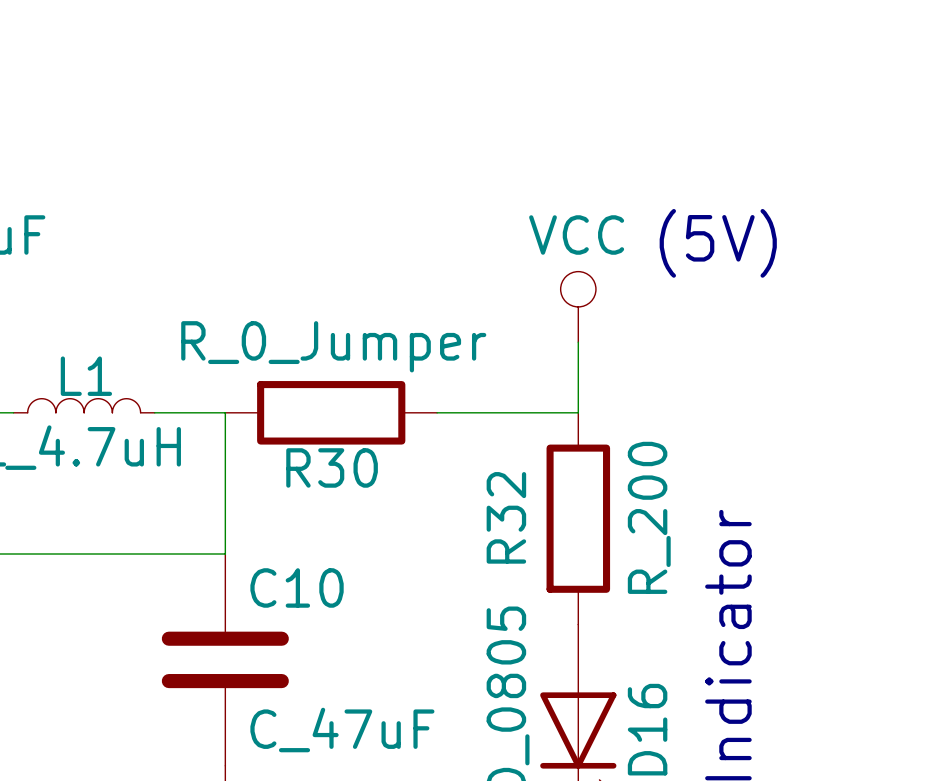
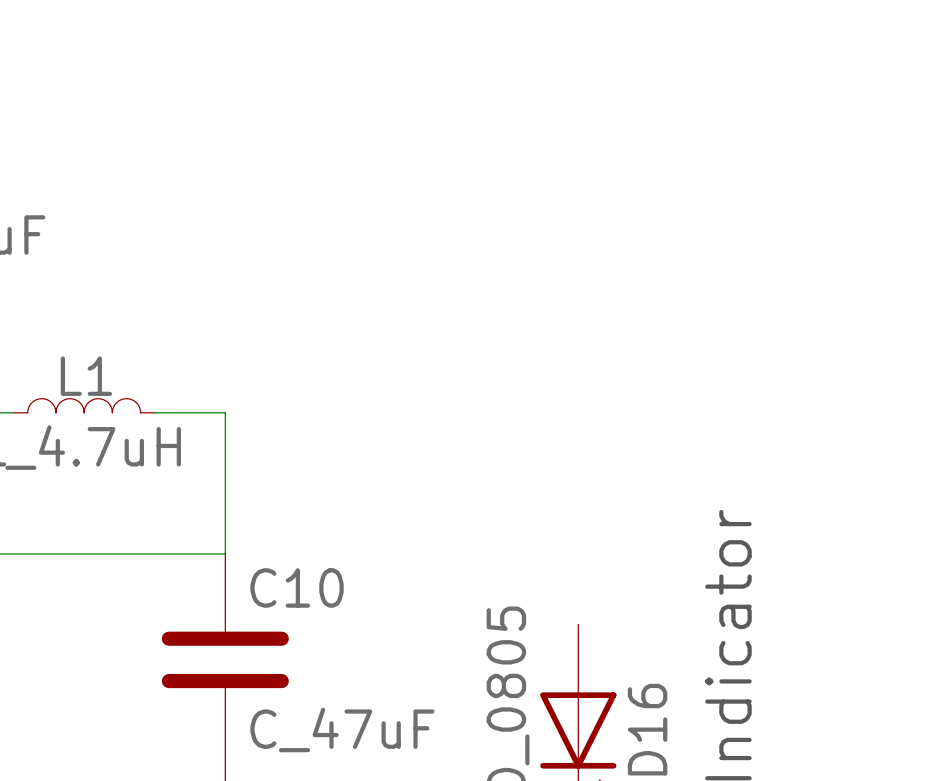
text: (5V) (718, 243) -> none
power symbol: VCC (578, 306) -> none
wire: (578, 342) (578, 412) (437, 412) -> none
R30: R_0_Jumper (331, 412) -> none
R32: R_200 (578, 518) -> none

